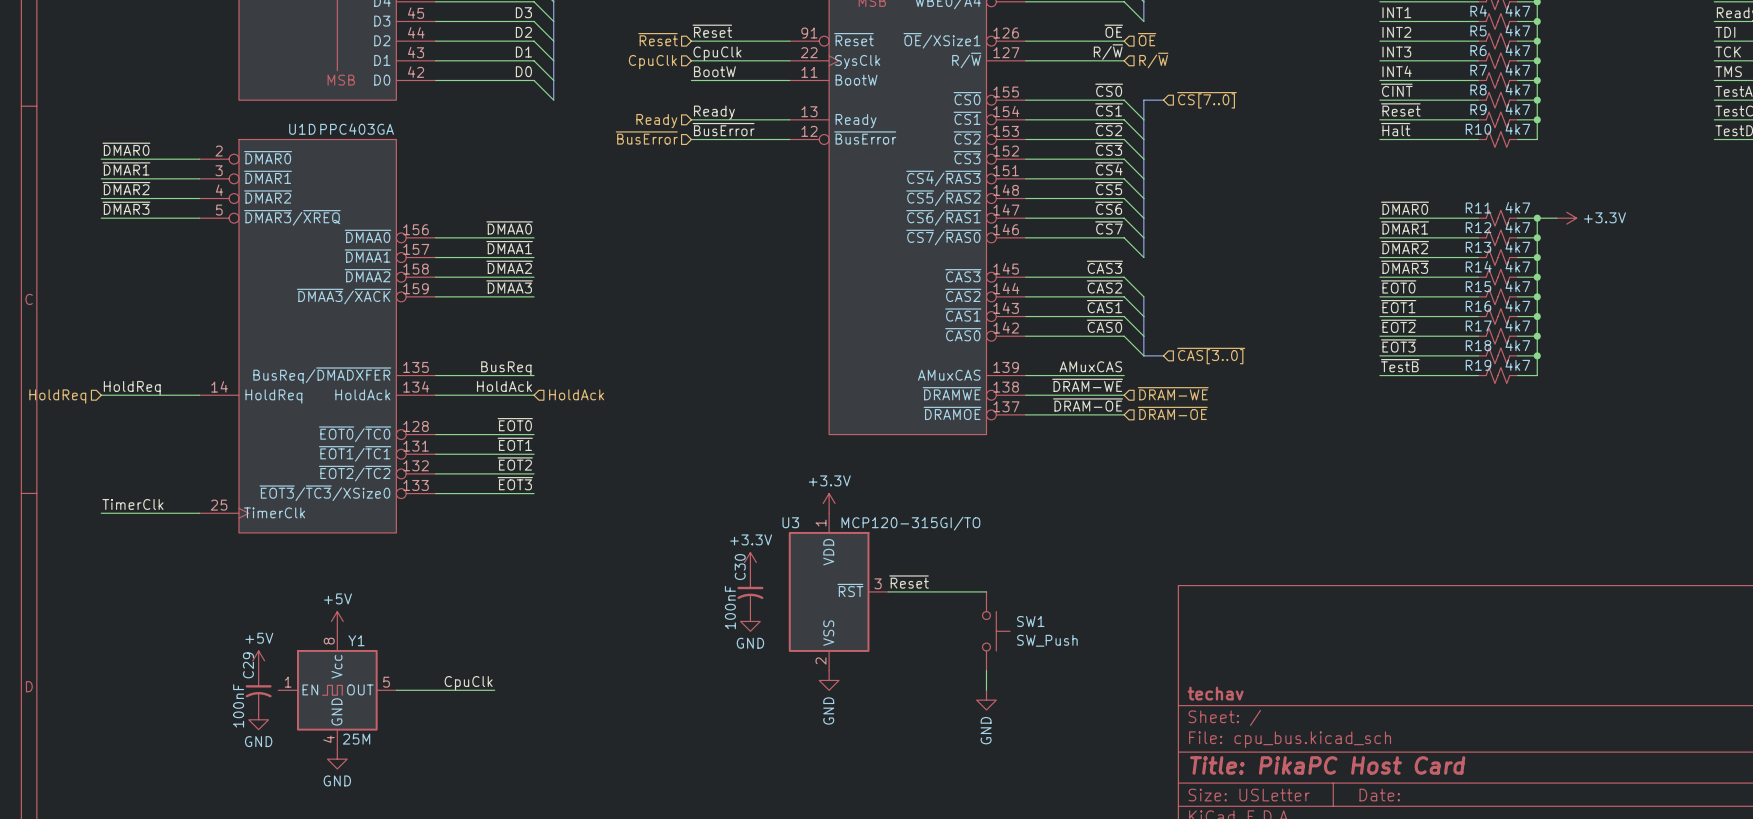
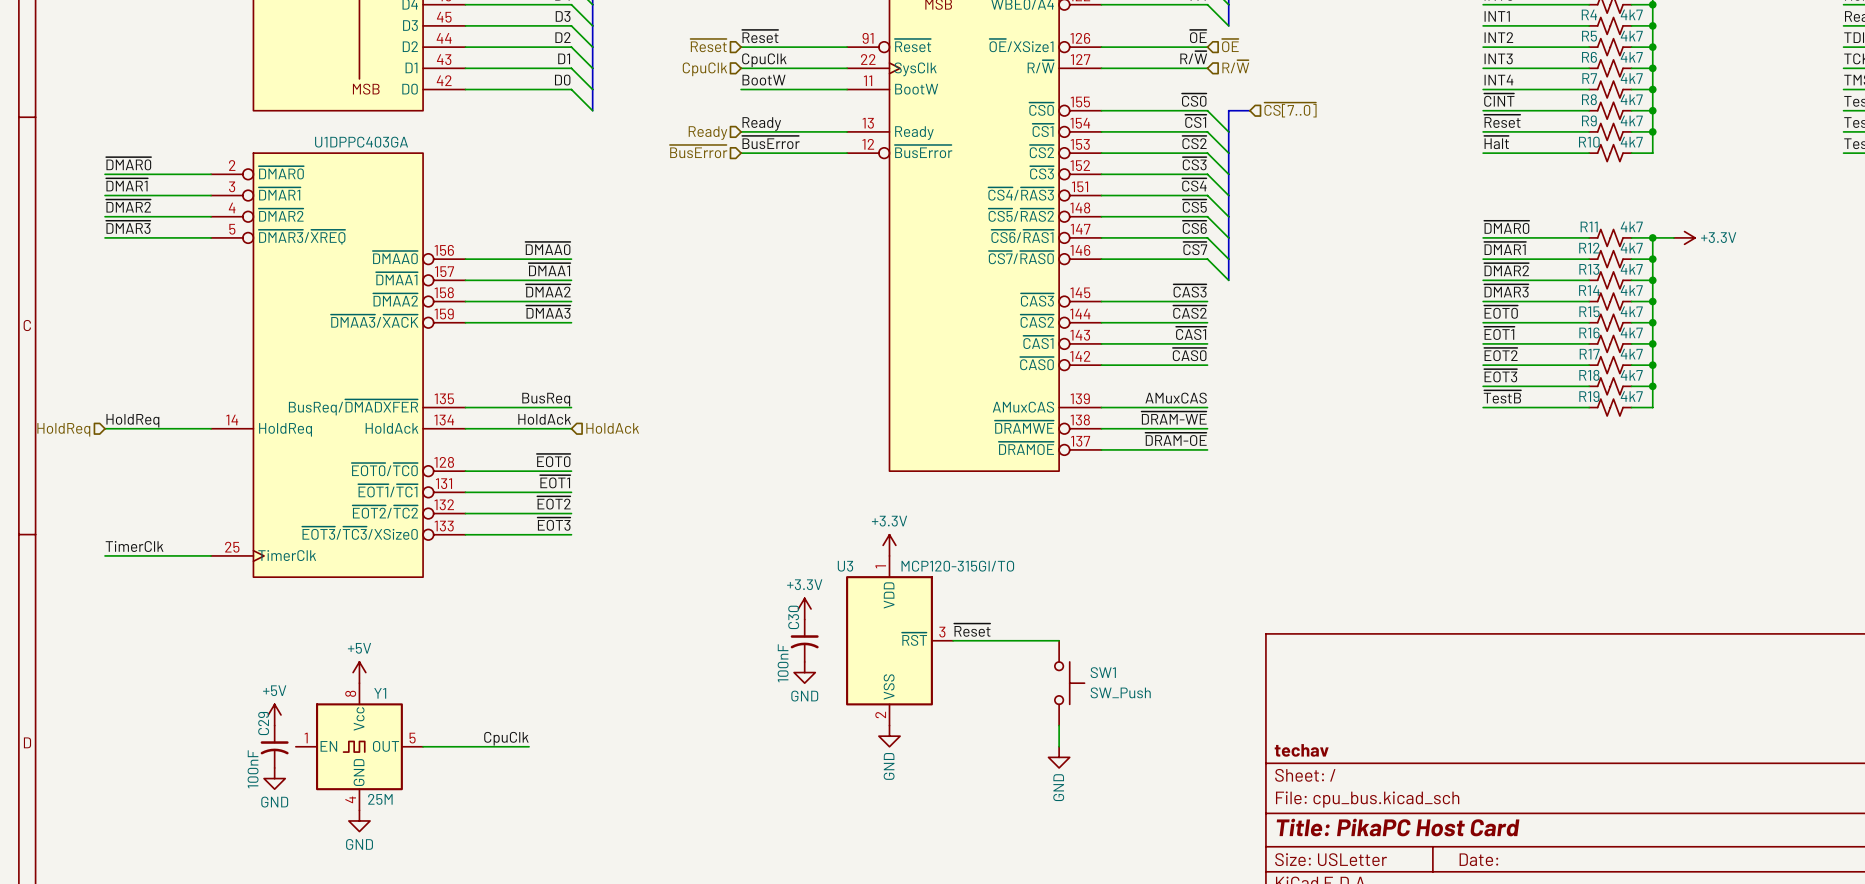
wire: (1124, 277) (1143, 296) -> none
wire: (1124, 296) (1143, 316) -> none
bus: (1143, 296) (1143, 355) (1163, 355) -> none
wire: (1124, 316) (1143, 336) -> none
wire: (1124, 336) (1143, 355) -> none
hierarchical label: ~{CAS[3..0]} (1211, 356) -> none
hierarchical label: ~{DRAM-WE} (1173, 393) -> none
hierarchical label: ~{DRAM-OE} (1172, 413) -> none

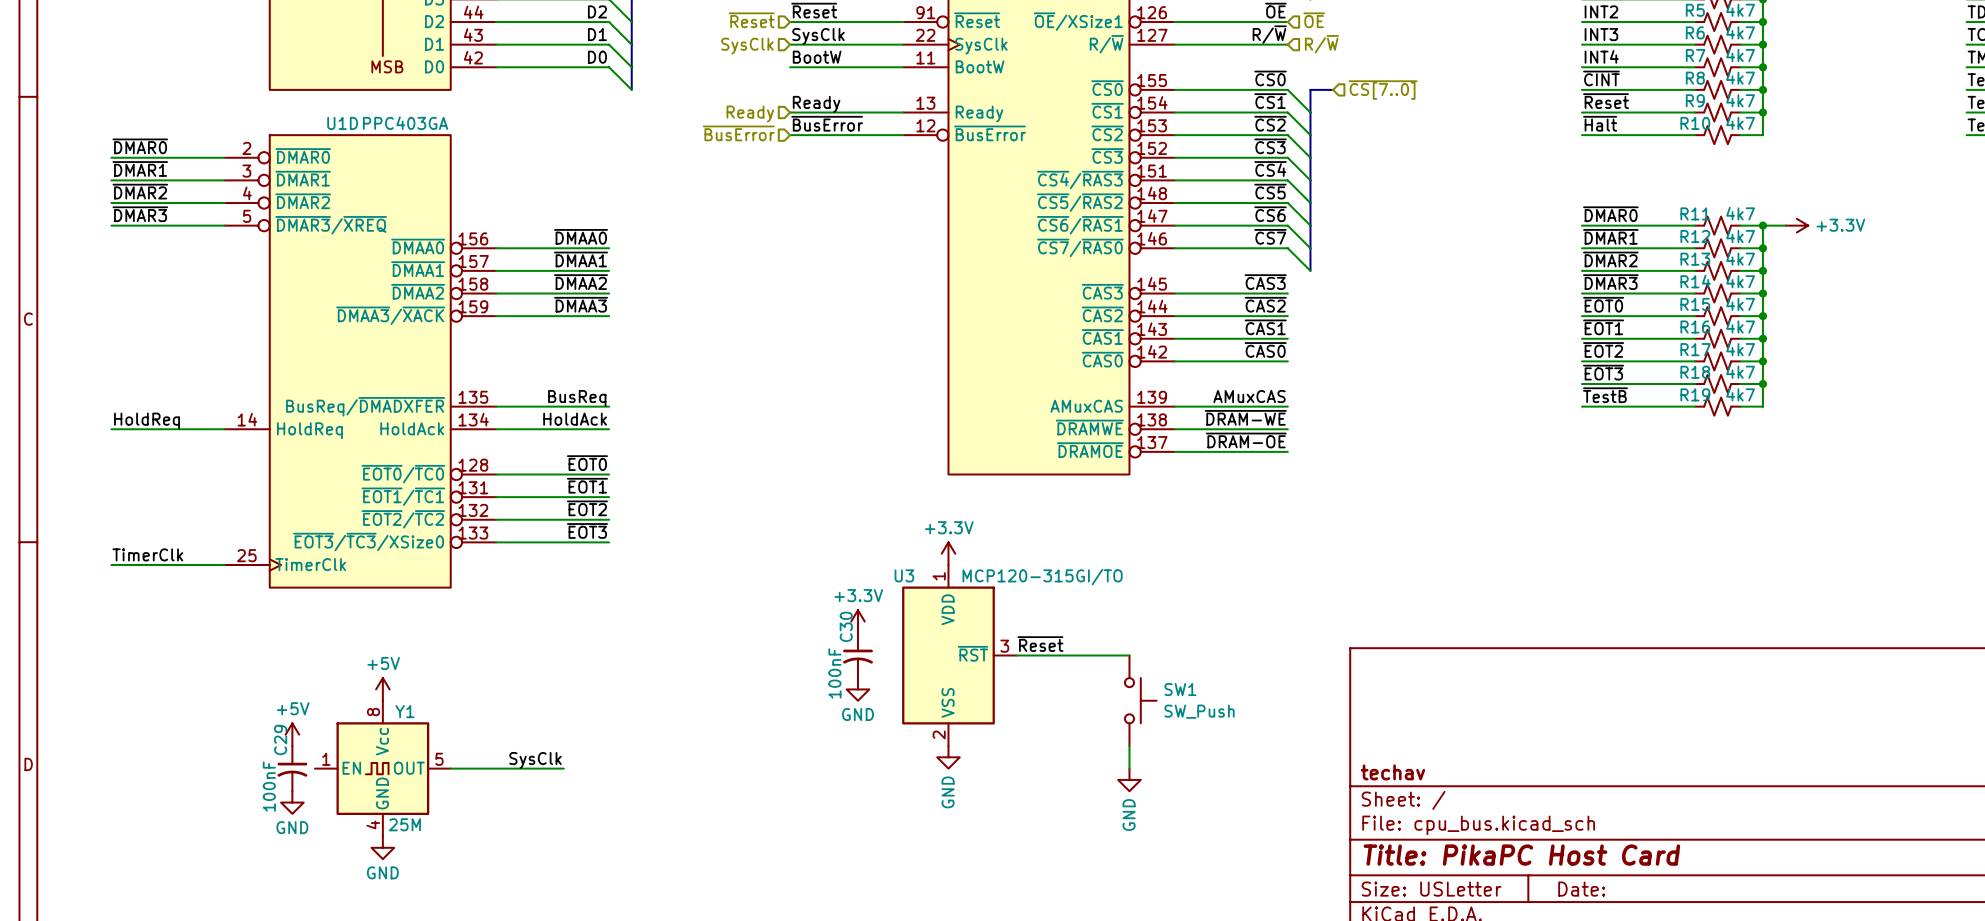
label: CpuClk (764, 60) -> SysClk (818, 36)
hierarchical label: CpuClk (704, 69) -> SysClk (747, 46)
hierarchical label: HoldAck (612, 428) -> none
hierarchical label: HoldReq (63, 429) -> none
label: CpuClk (506, 738) -> SysClk (535, 760)

